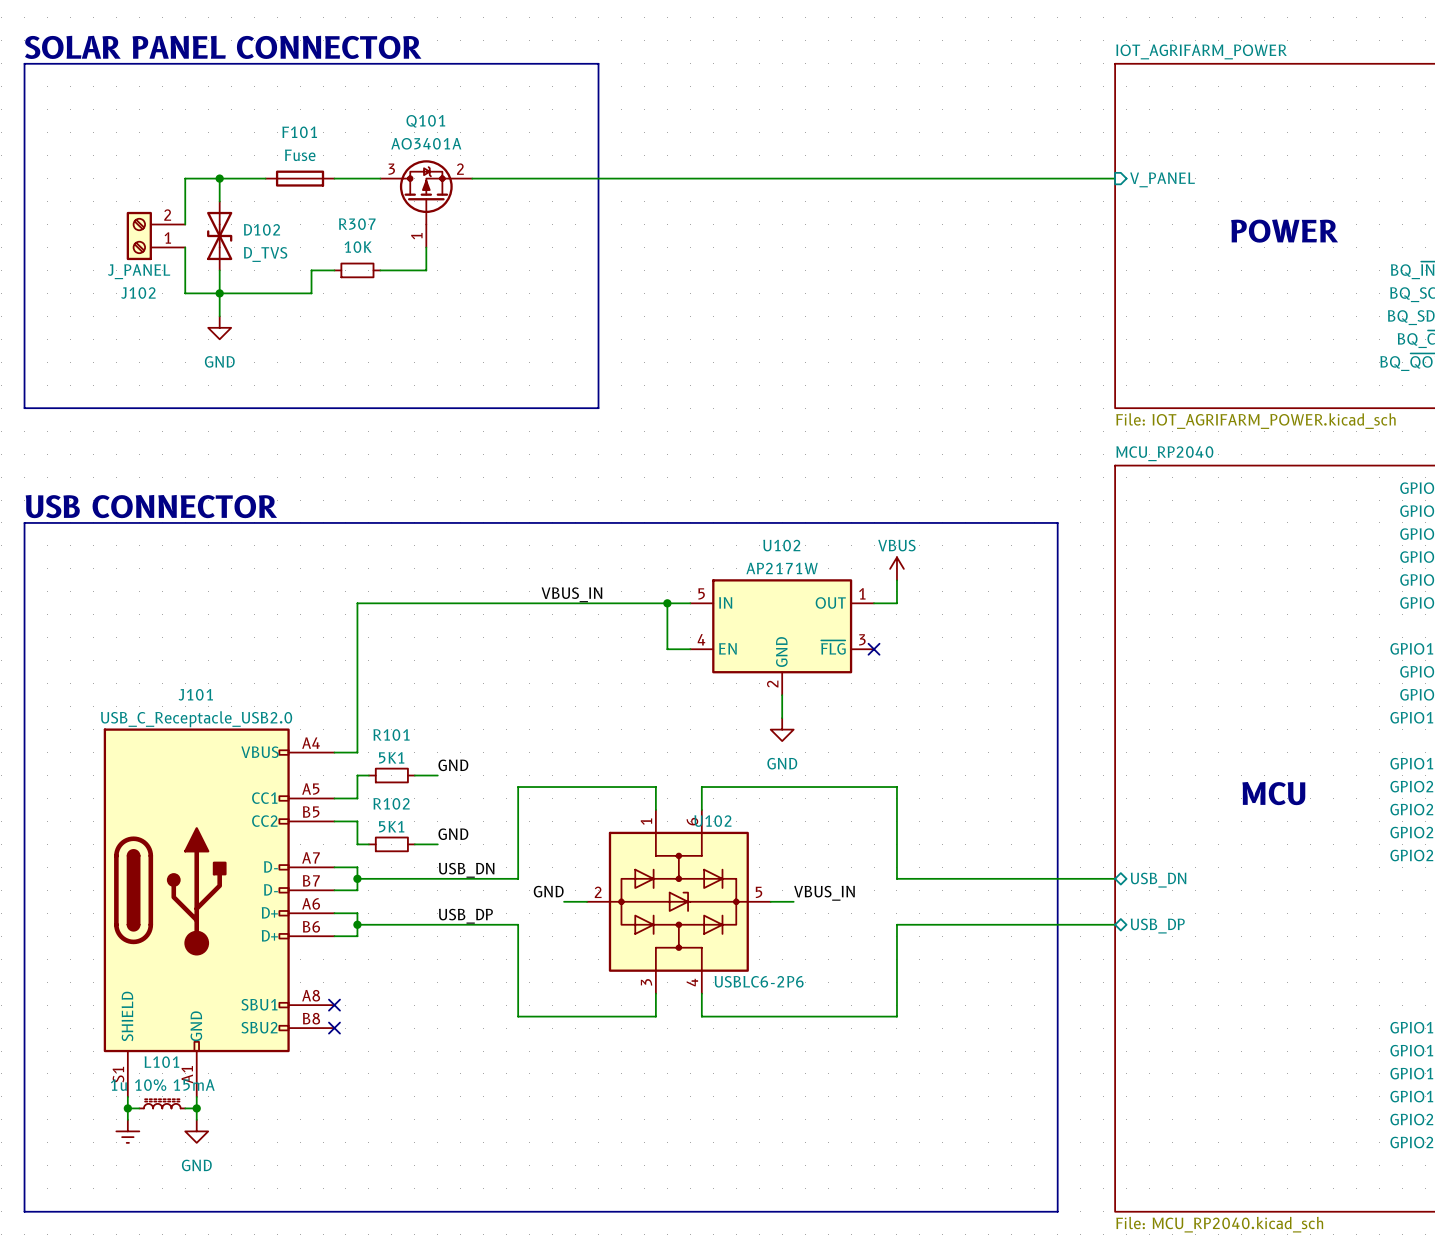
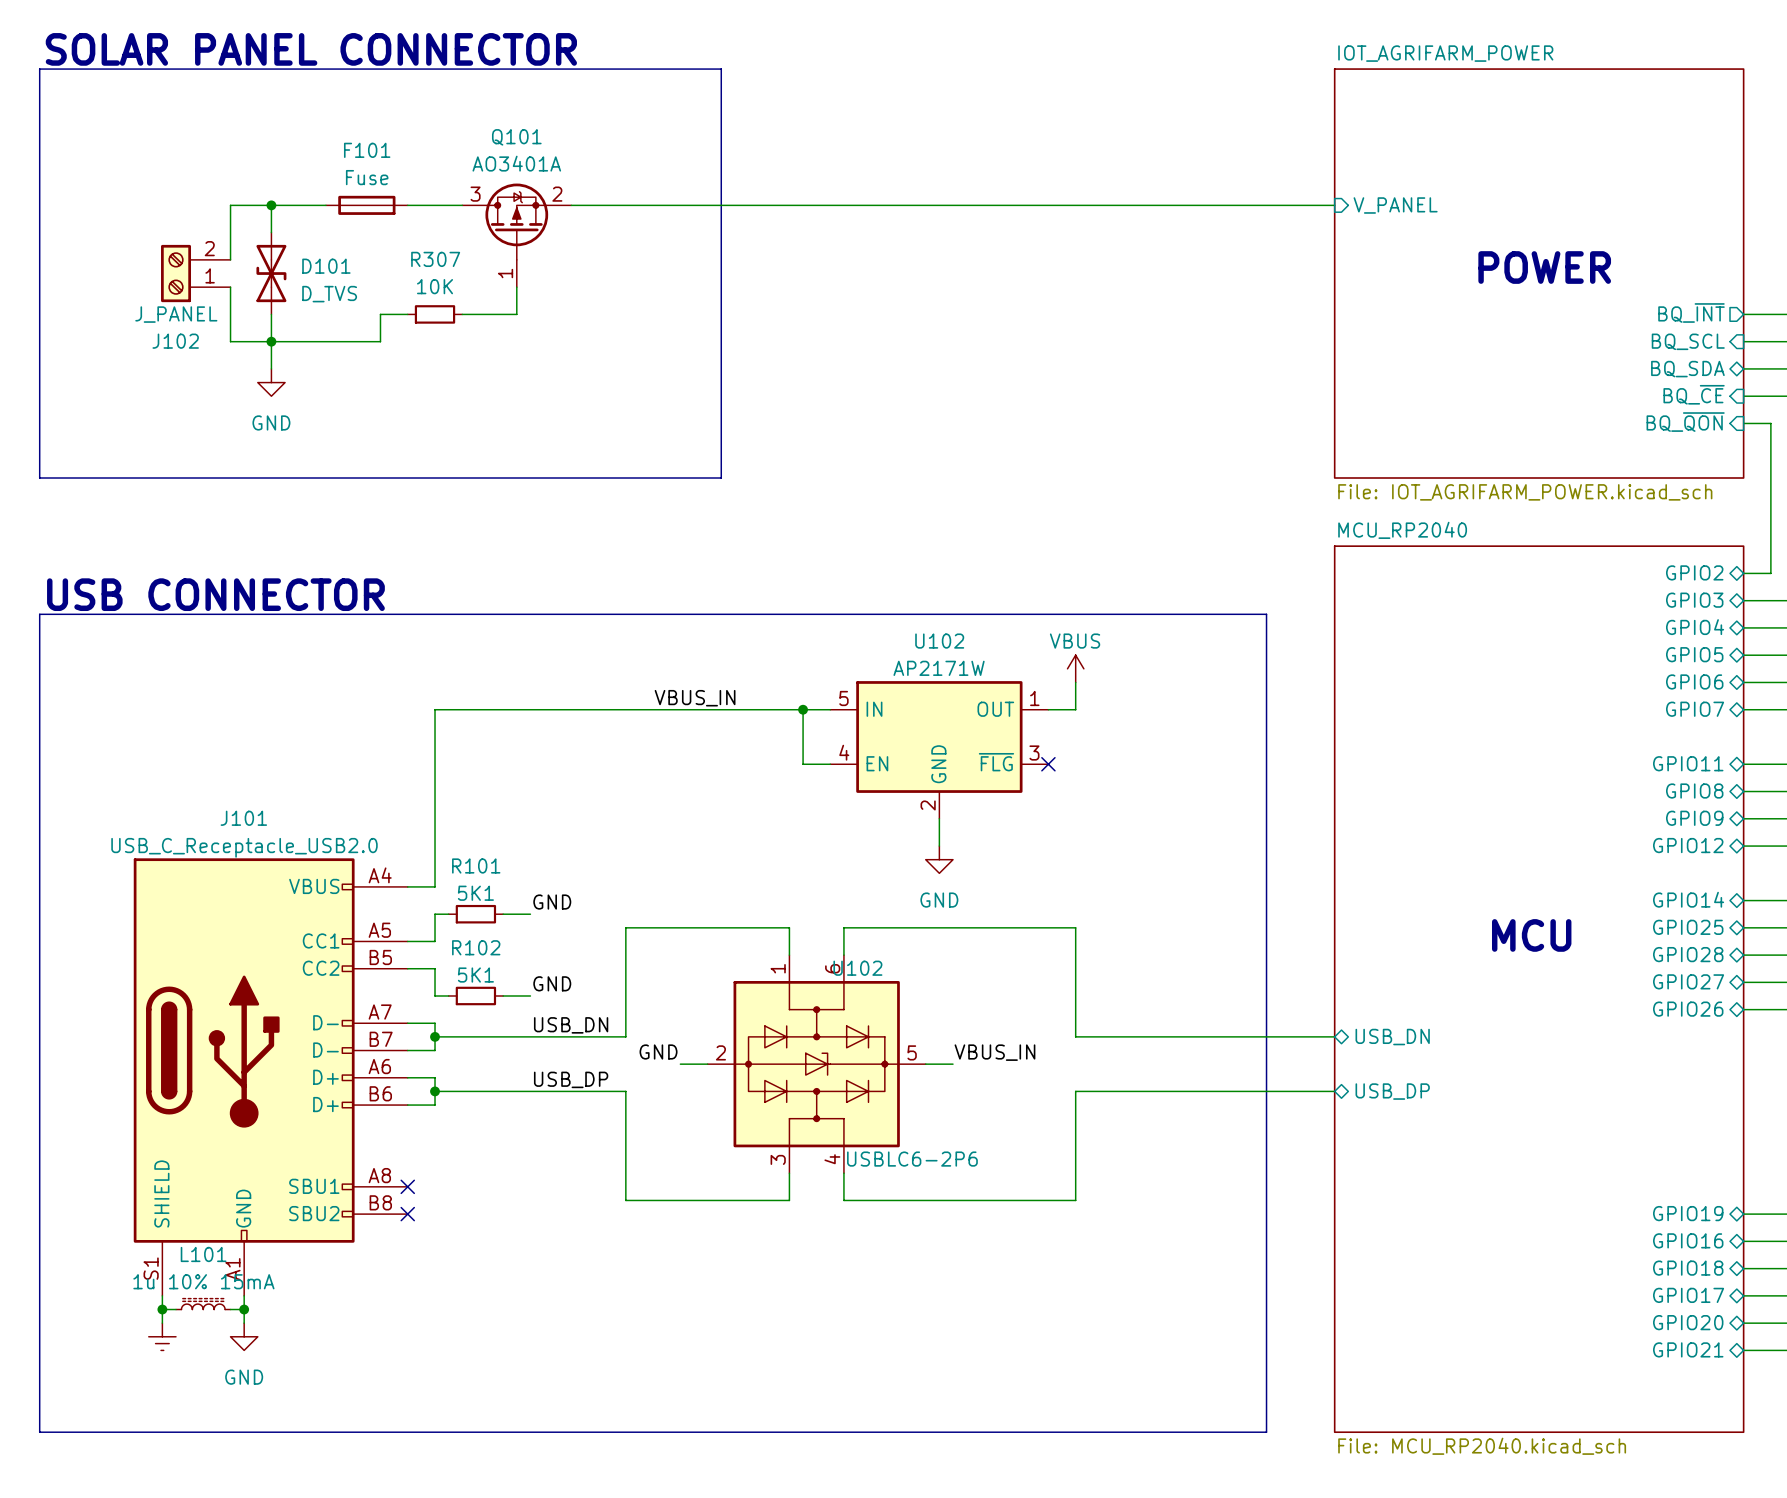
D102 name: D102 (262, 229) -> D101 (326, 266)

